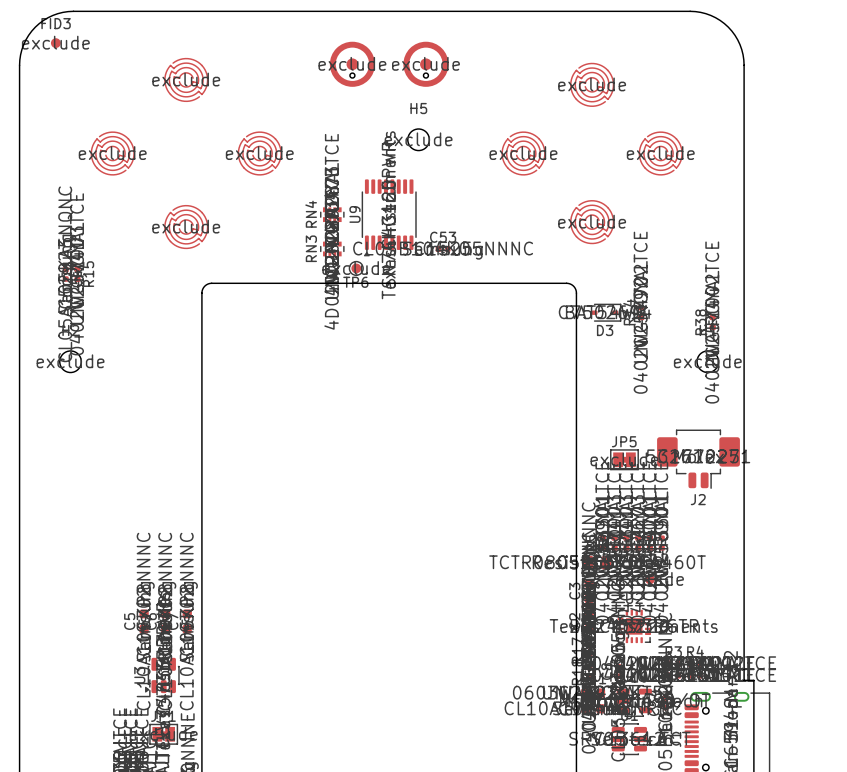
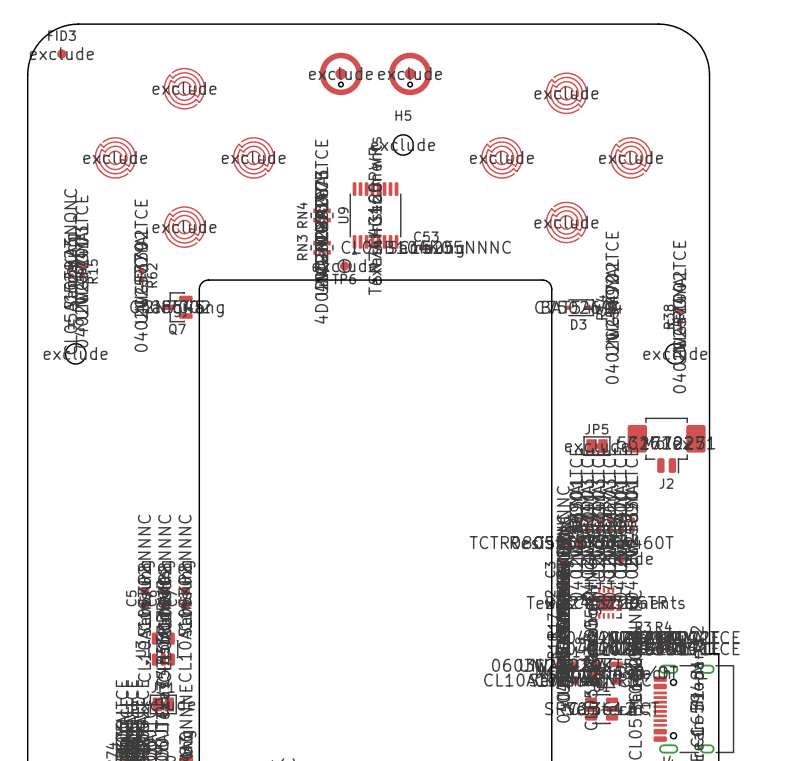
R62: none -> (141, 275)
Q7: none -> (177, 307)

